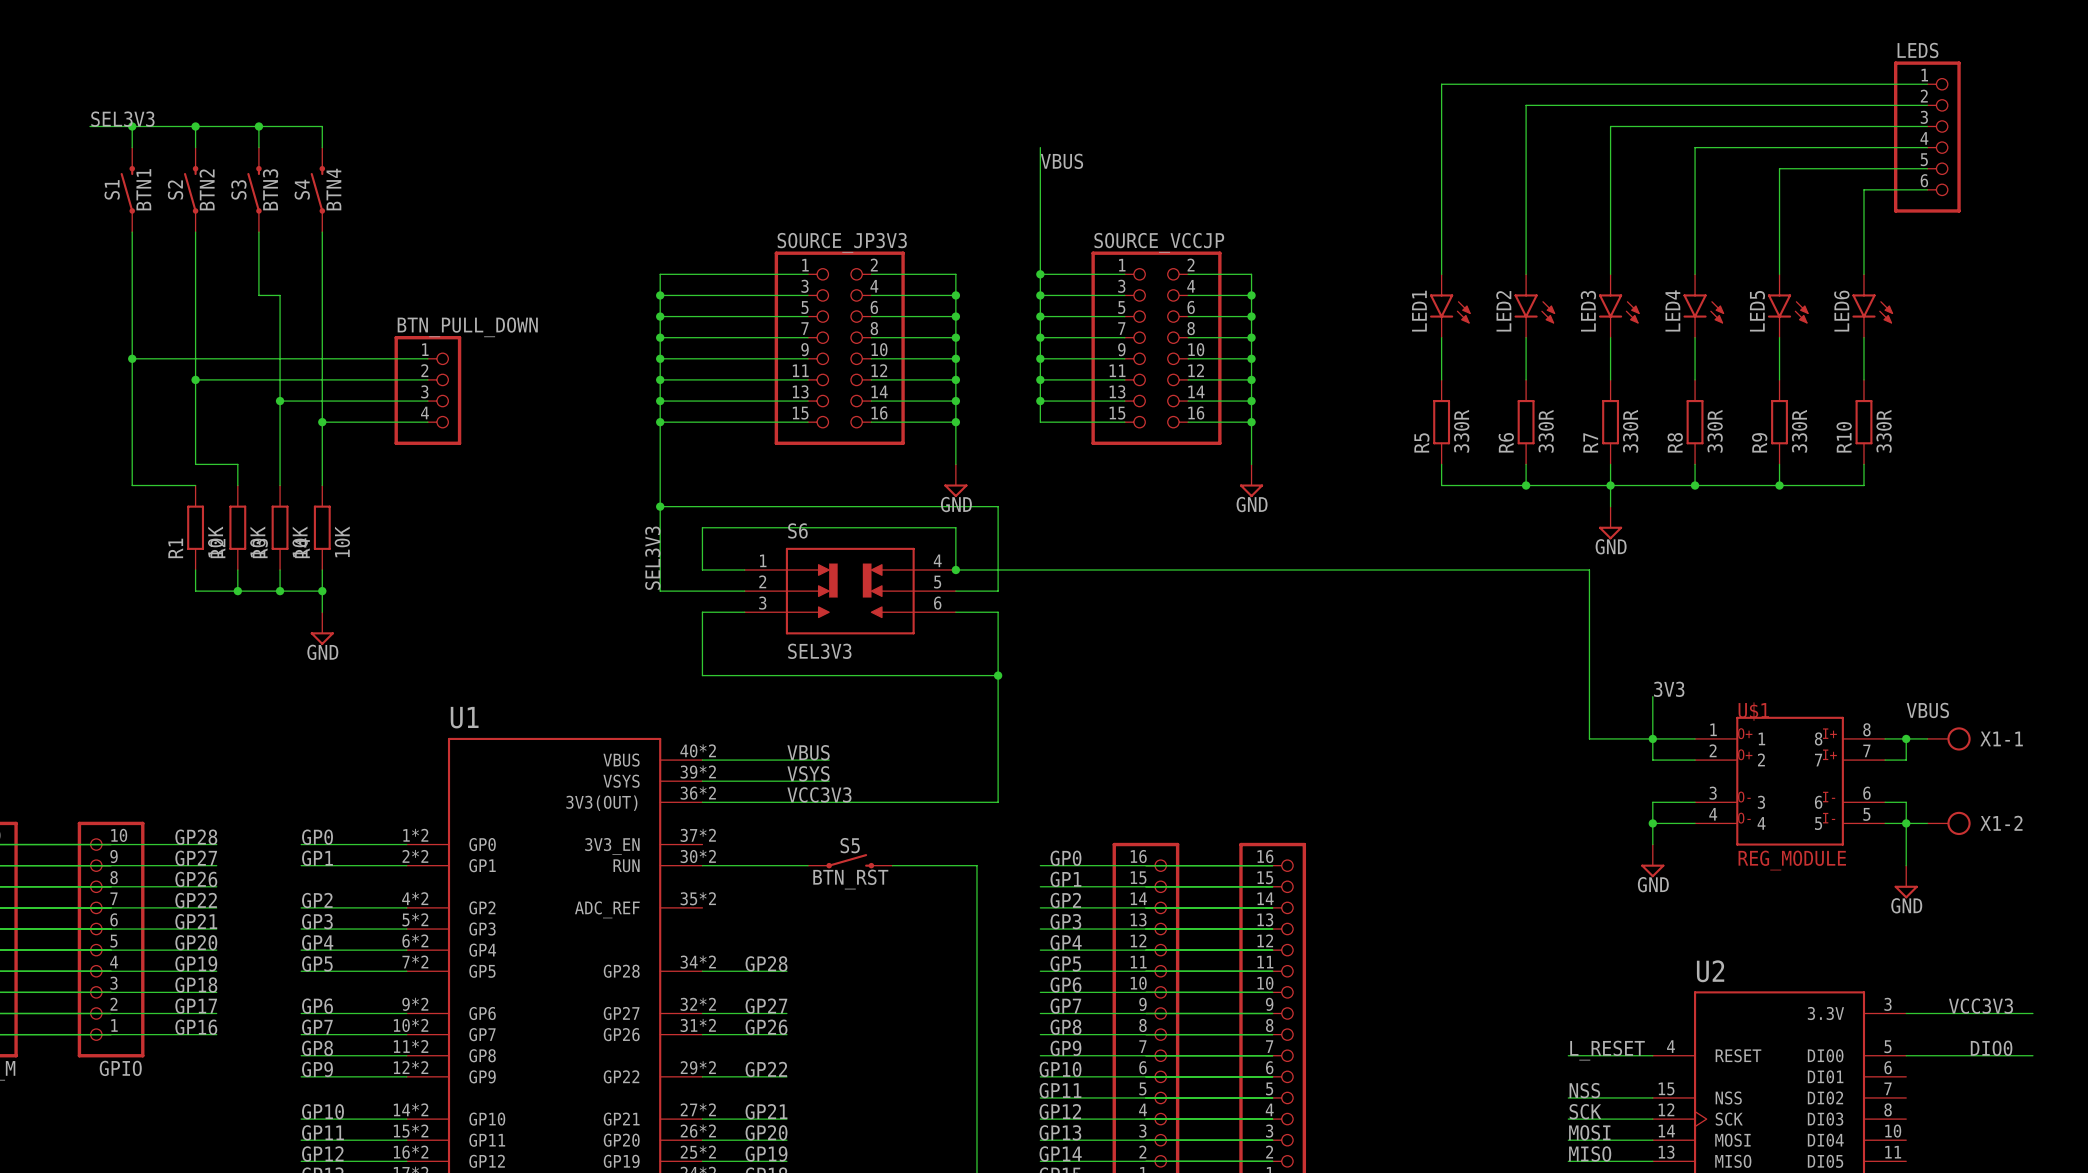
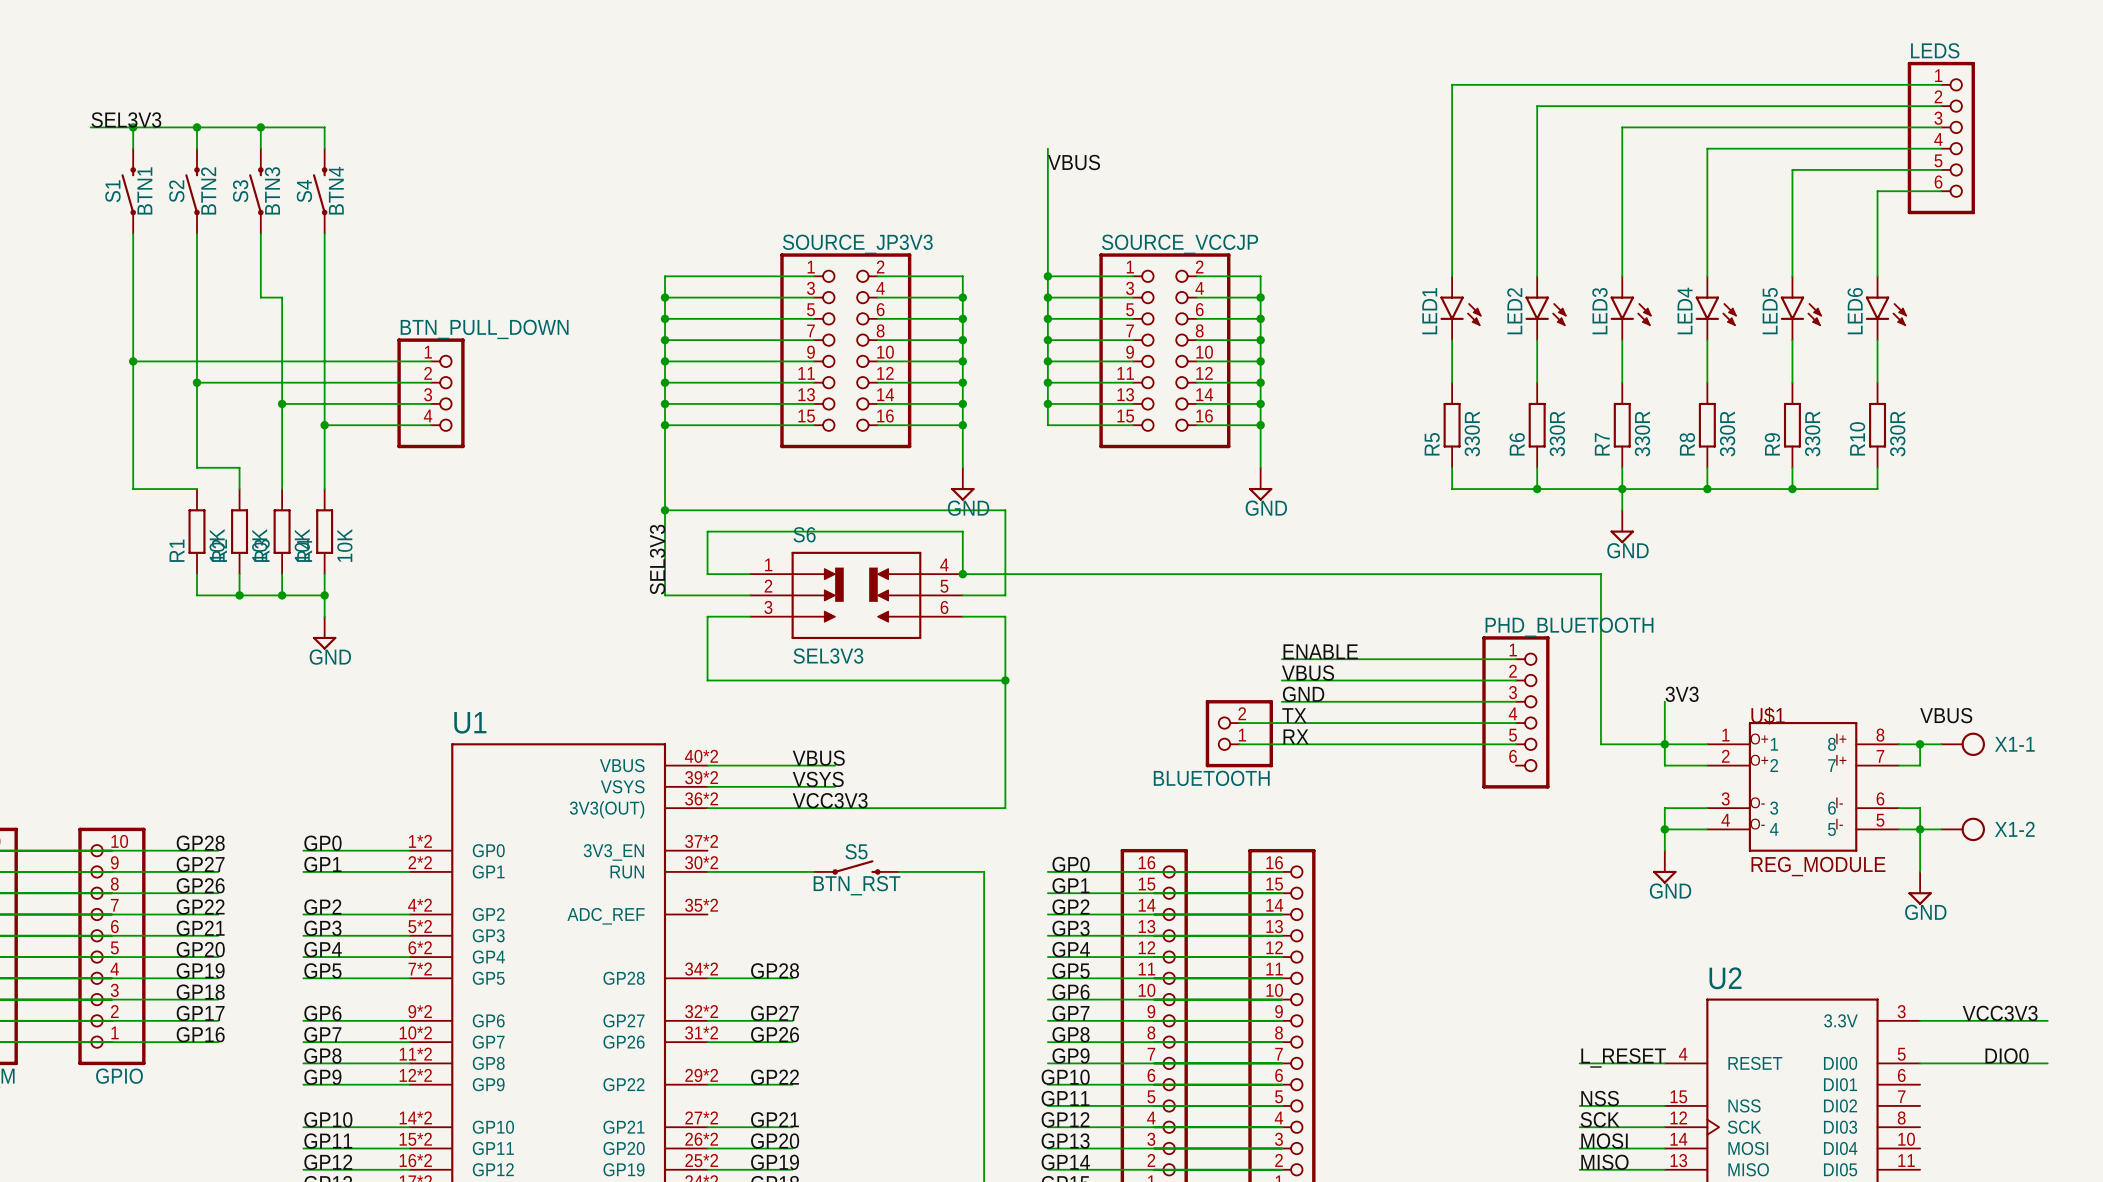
label: none -> ENABLE (1320, 651)
wire: none -> (1281, 659) (1515, 659)
label: none -> VBUS (1308, 673)
wire: none -> (1281, 680) (1515, 680)
label: none -> GND (1303, 694)
wire: none -> (1281, 701) (1515, 701)
PHD_BLUETOOTH: none -> (1515, 712)
label: none -> TX (1294, 715)
wire: none -> (1239, 723) (1515, 723)
BLUETOOTH: none -> (1239, 733)
label: none -> RX (1296, 736)
wire: none -> (1239, 744) (1515, 744)

